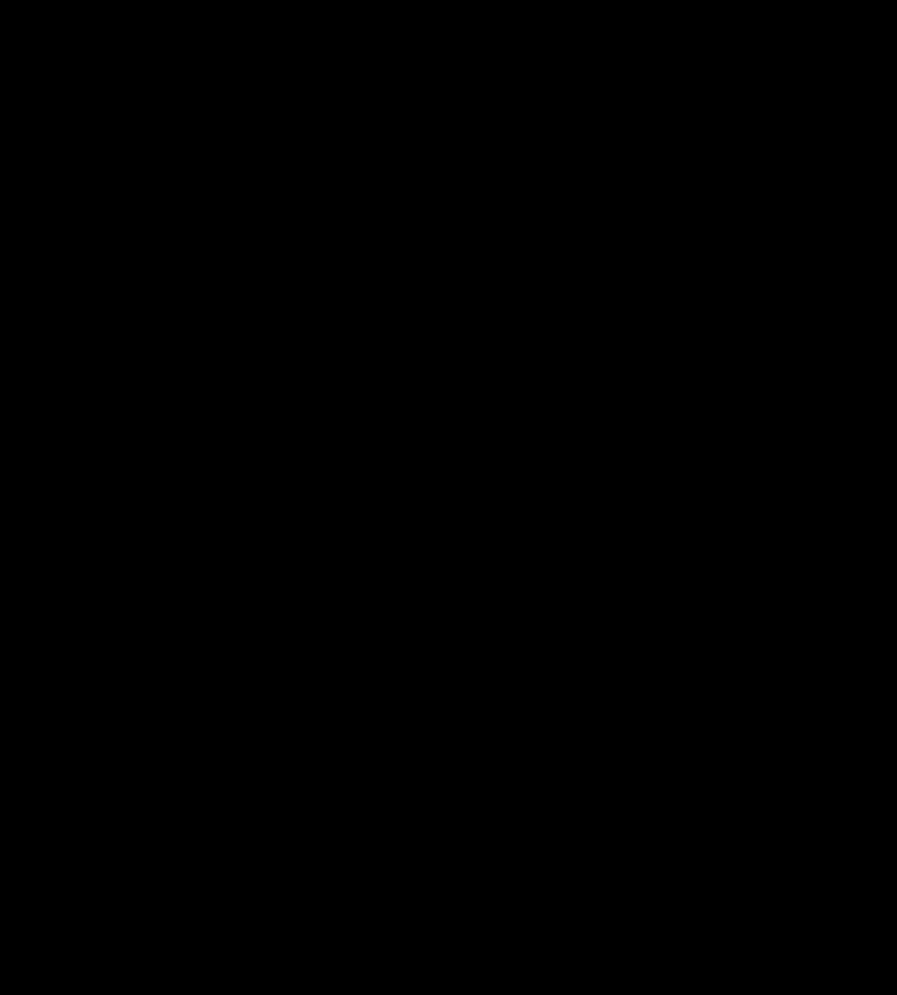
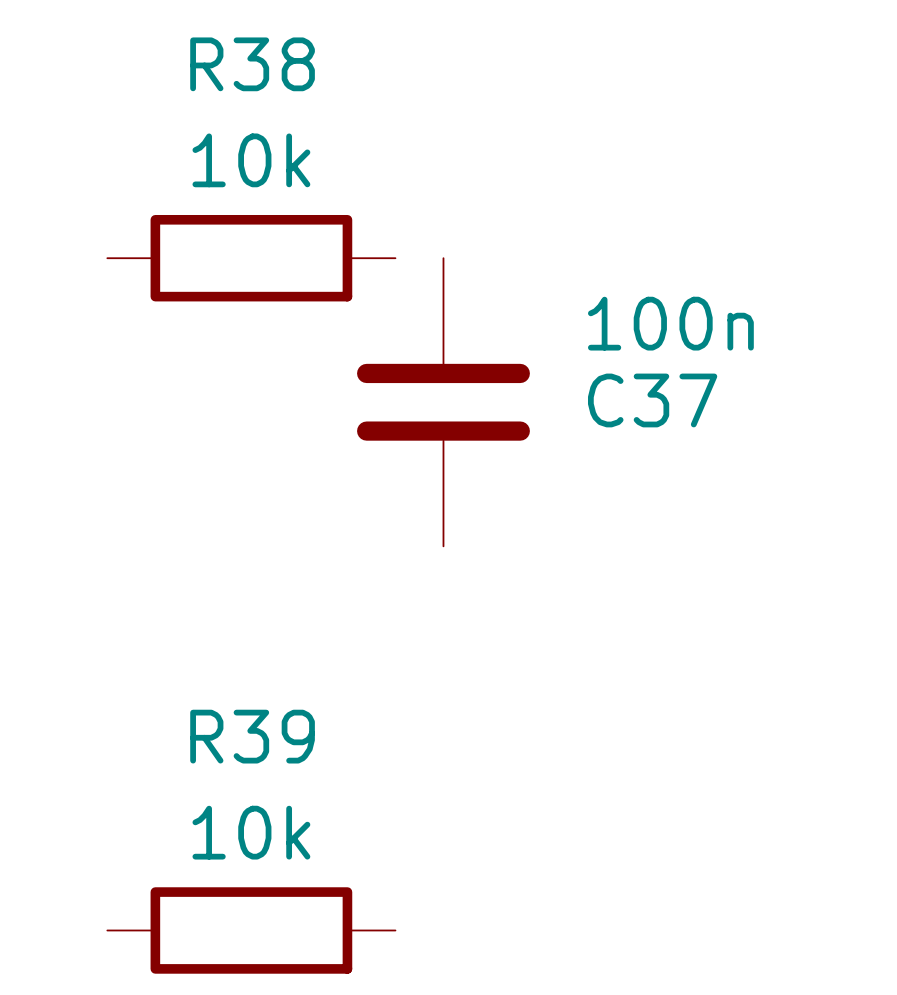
R38: none -> 10k (251, 258)
C37: none -> 100n (443, 402)
R39: none -> 10k (251, 930)

